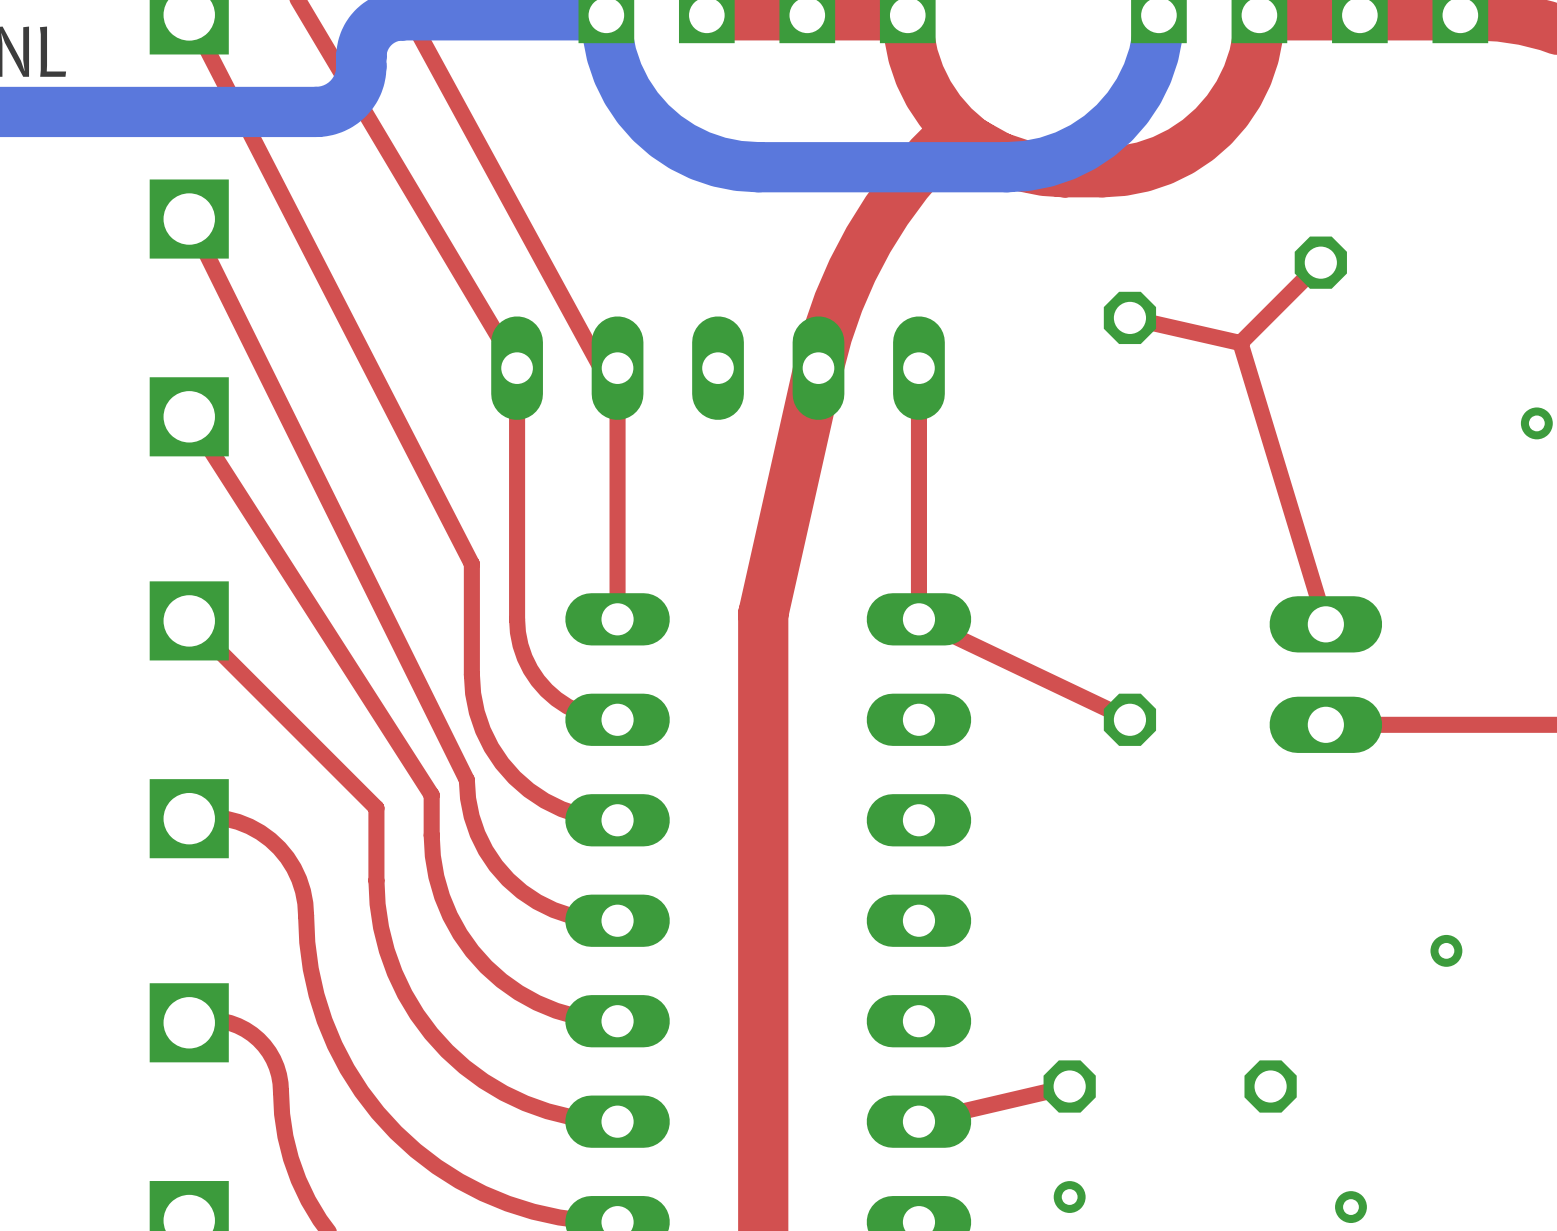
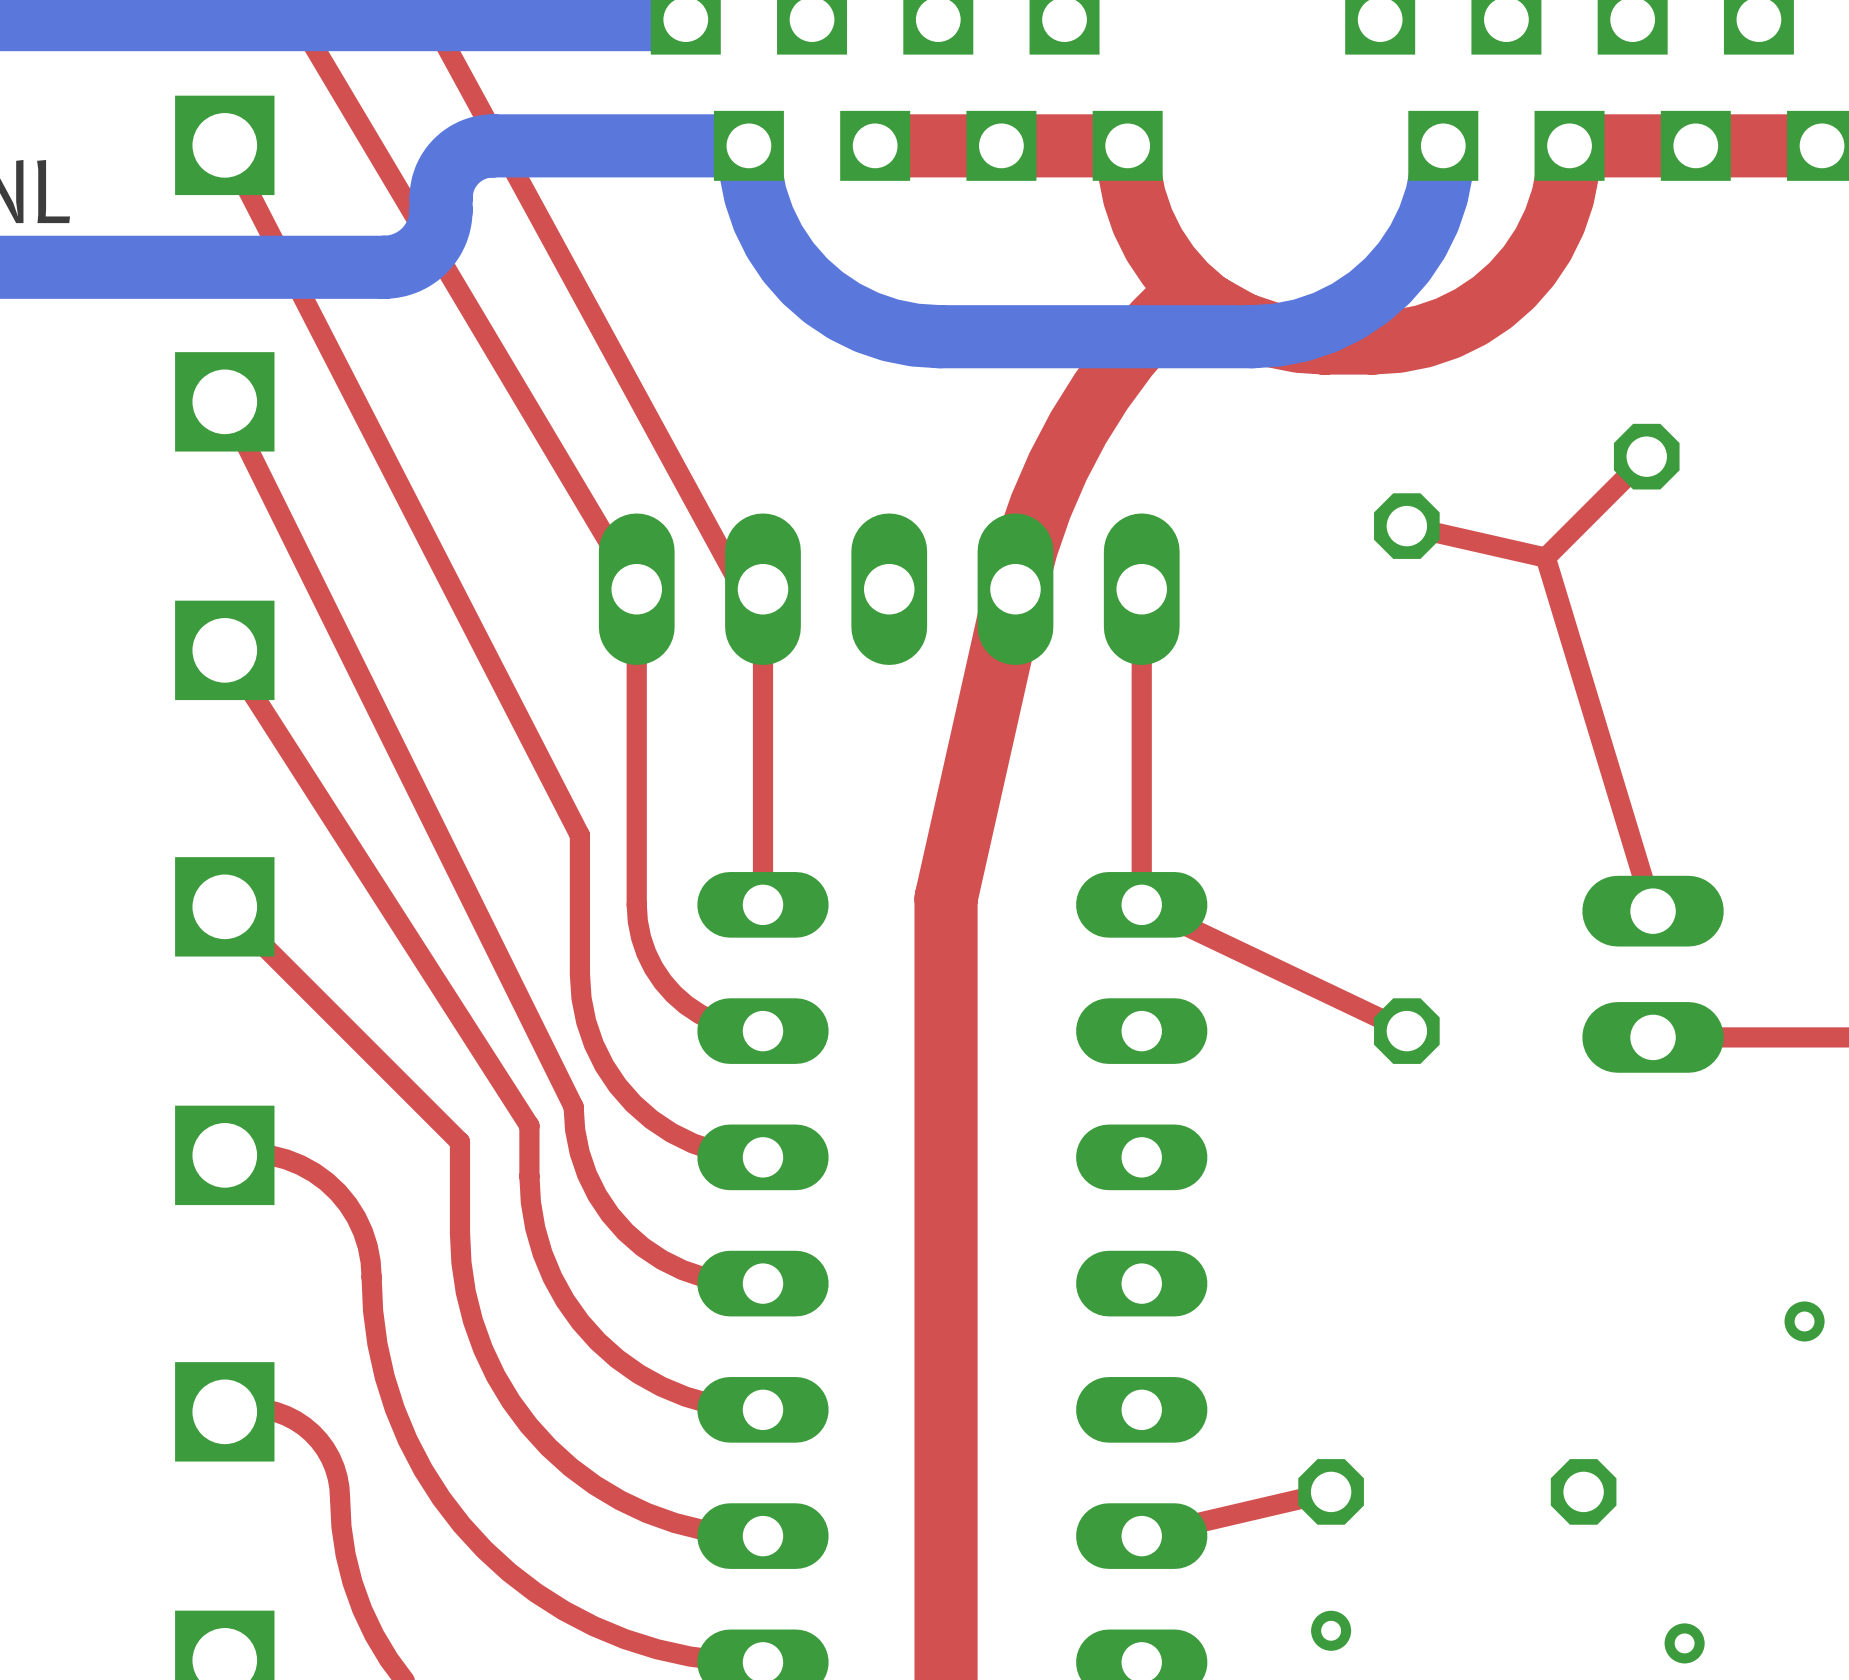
part footprint: [491, 316, 945, 420] -> [598, 513, 1180, 665]

